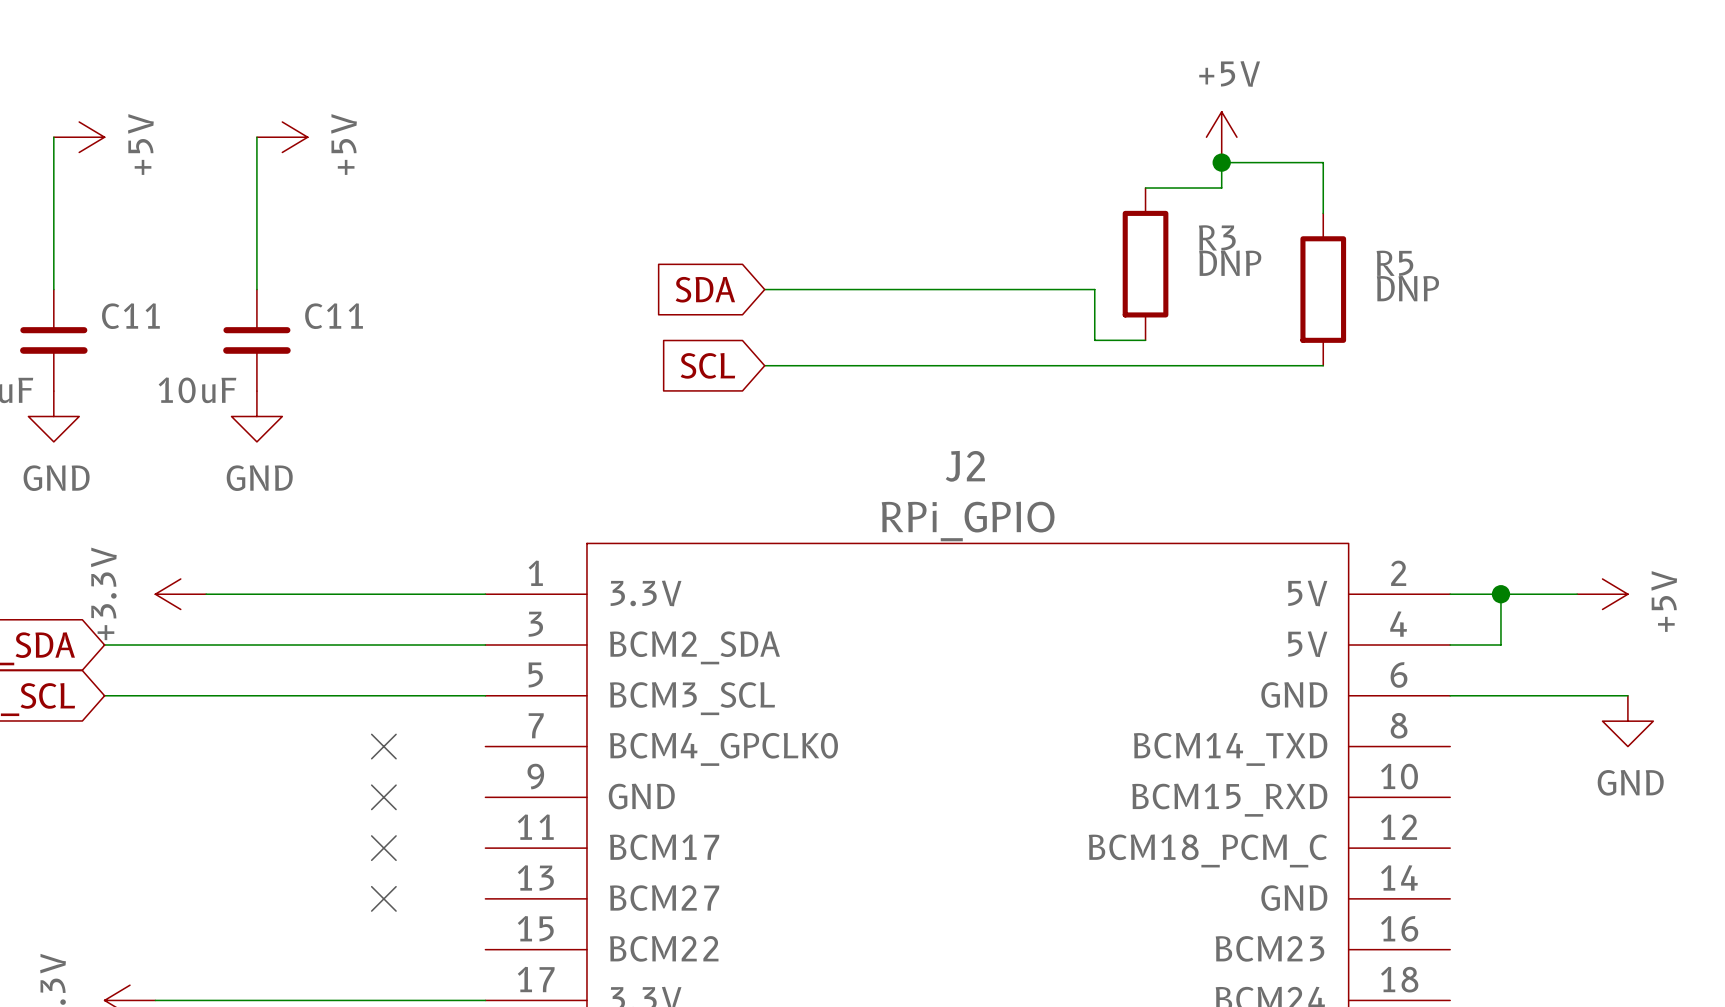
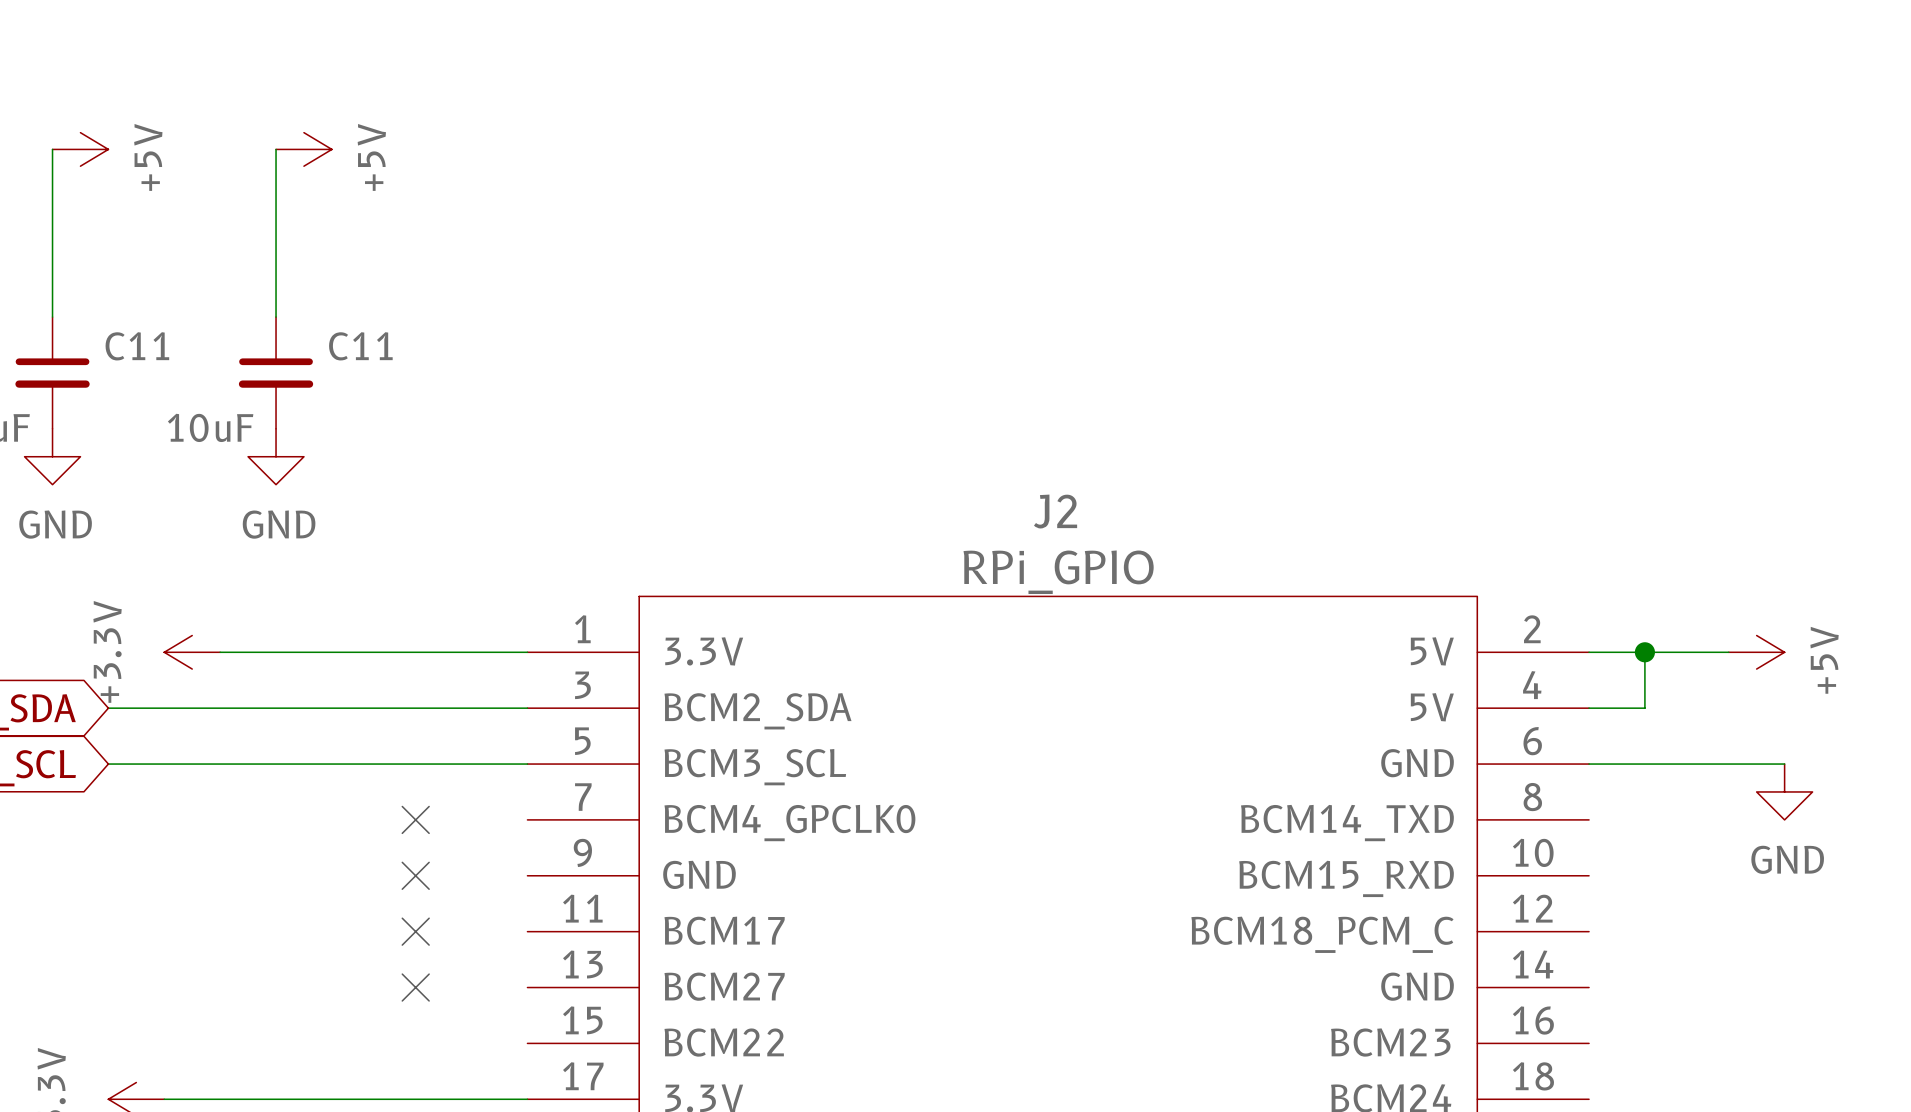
power symbol: +5V (1221, 137) -> none
junction: (1221, 162) -> none
wire: (1145, 188) (1221, 188) (1221, 162) (1323, 162) (1323, 213) -> none
R3: DNP (1145, 264) -> none
global label: SDA (705, 289) -> none
wire: (764, 289) (1094, 289) (1094, 340) (1145, 340) -> none
R5: DNP (1323, 289) -> none
global label: SCL (707, 365) -> none
wire: (764, 365) (1323, 365) -> none

